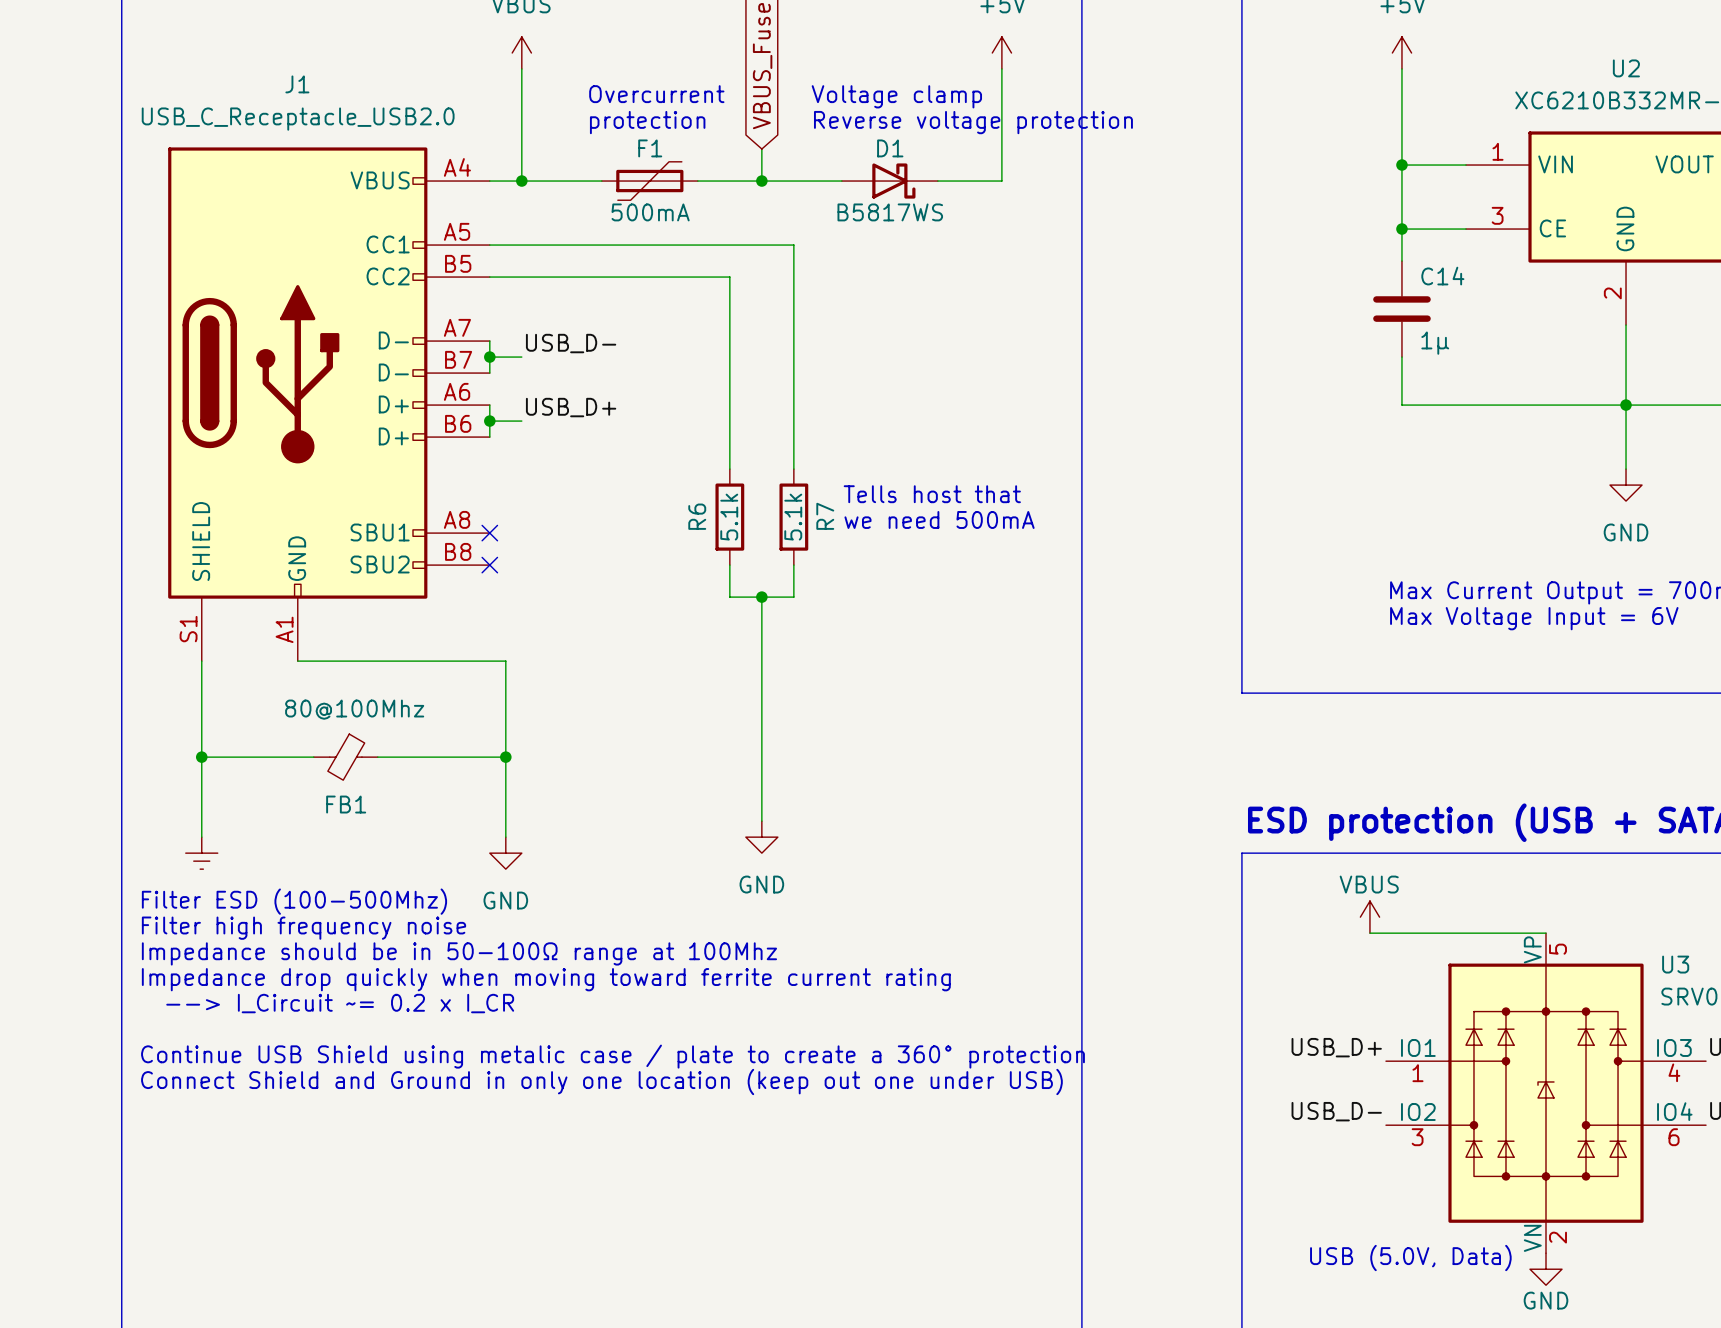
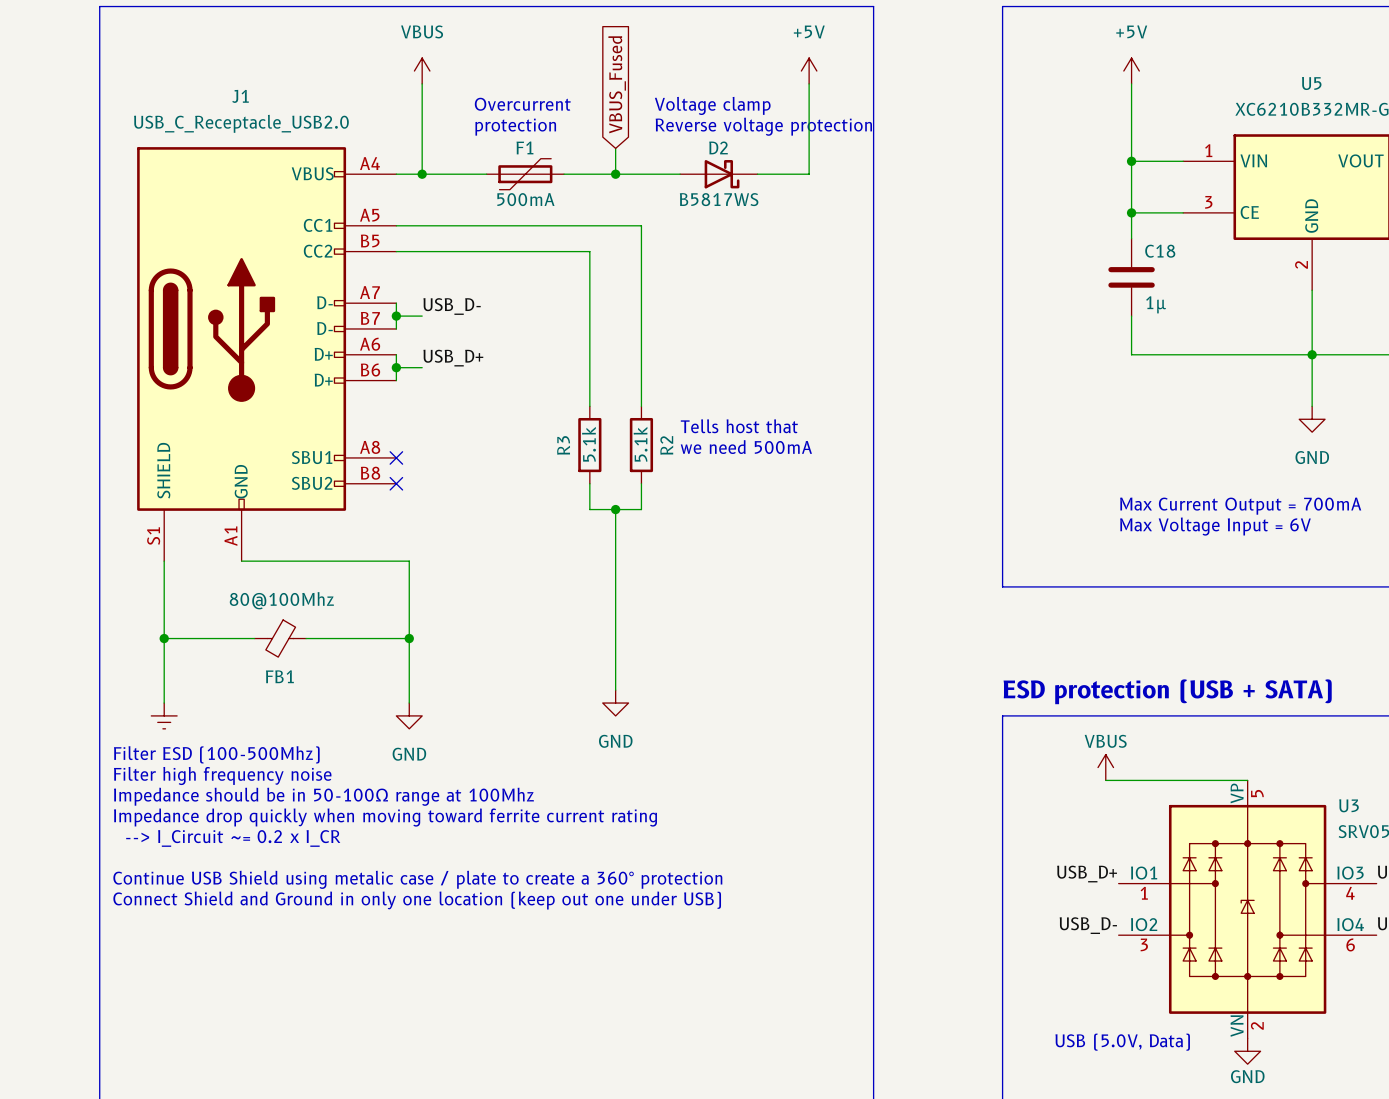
U2 name: U2 (1626, 68) -> U5 (1311, 83)
D1 name: D1 (890, 148) -> D2 (718, 147)
C14 name: C14 (1442, 276) -> C18 (1160, 251)
R6 name: R6 (697, 516) -> R3 (563, 445)
R7 name: R7 (825, 516) -> R2 (666, 445)

